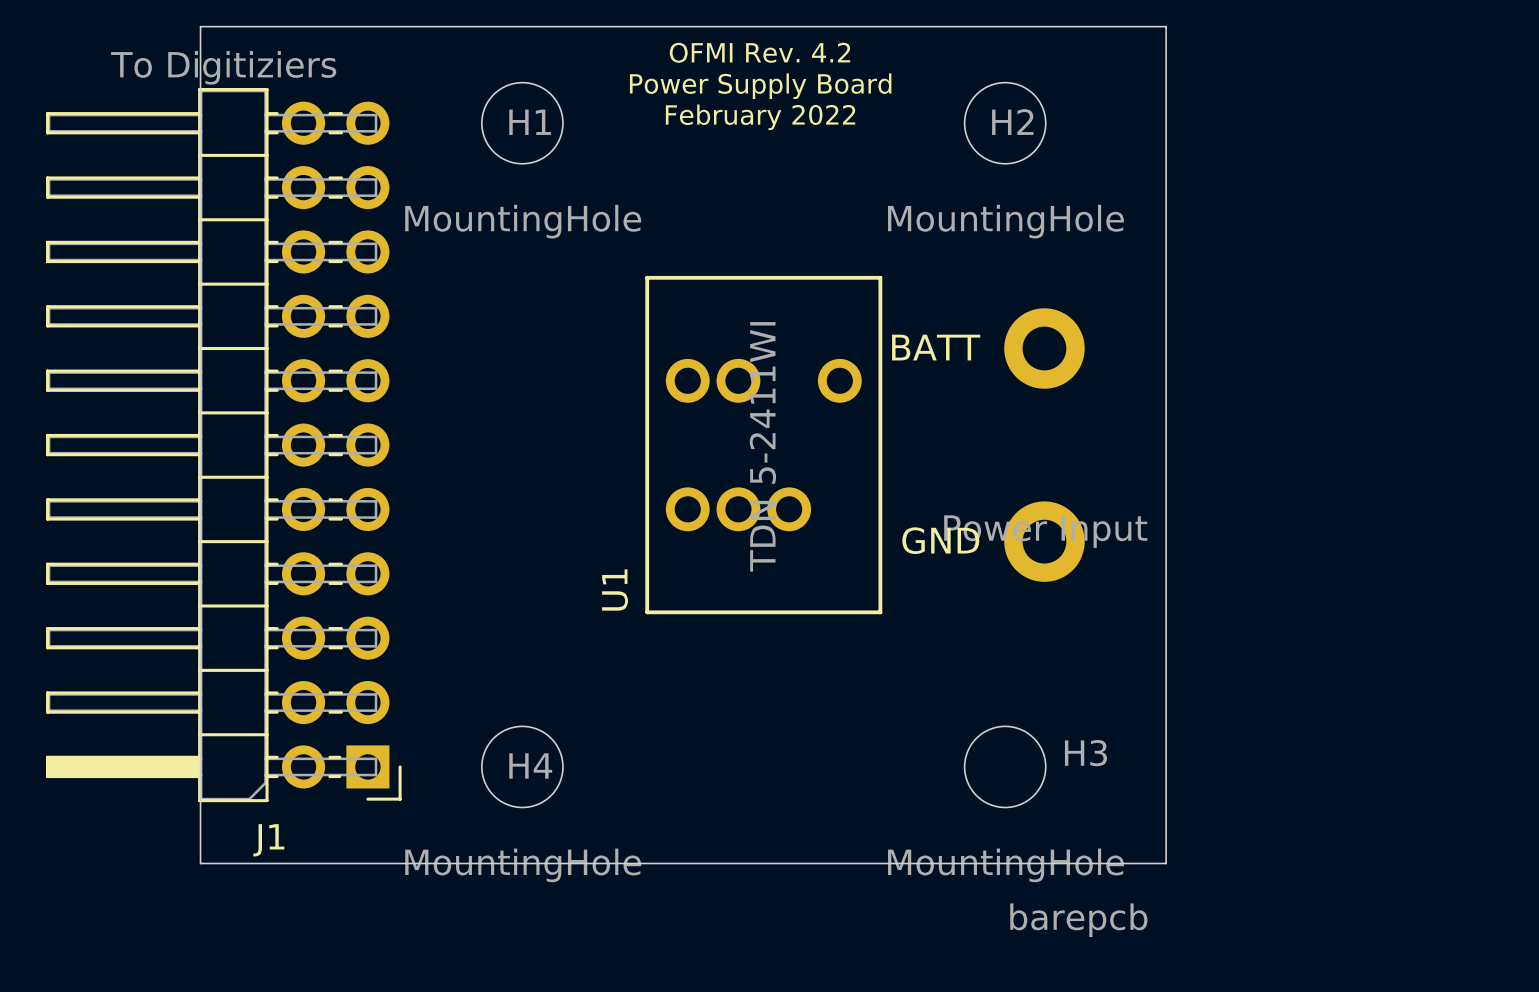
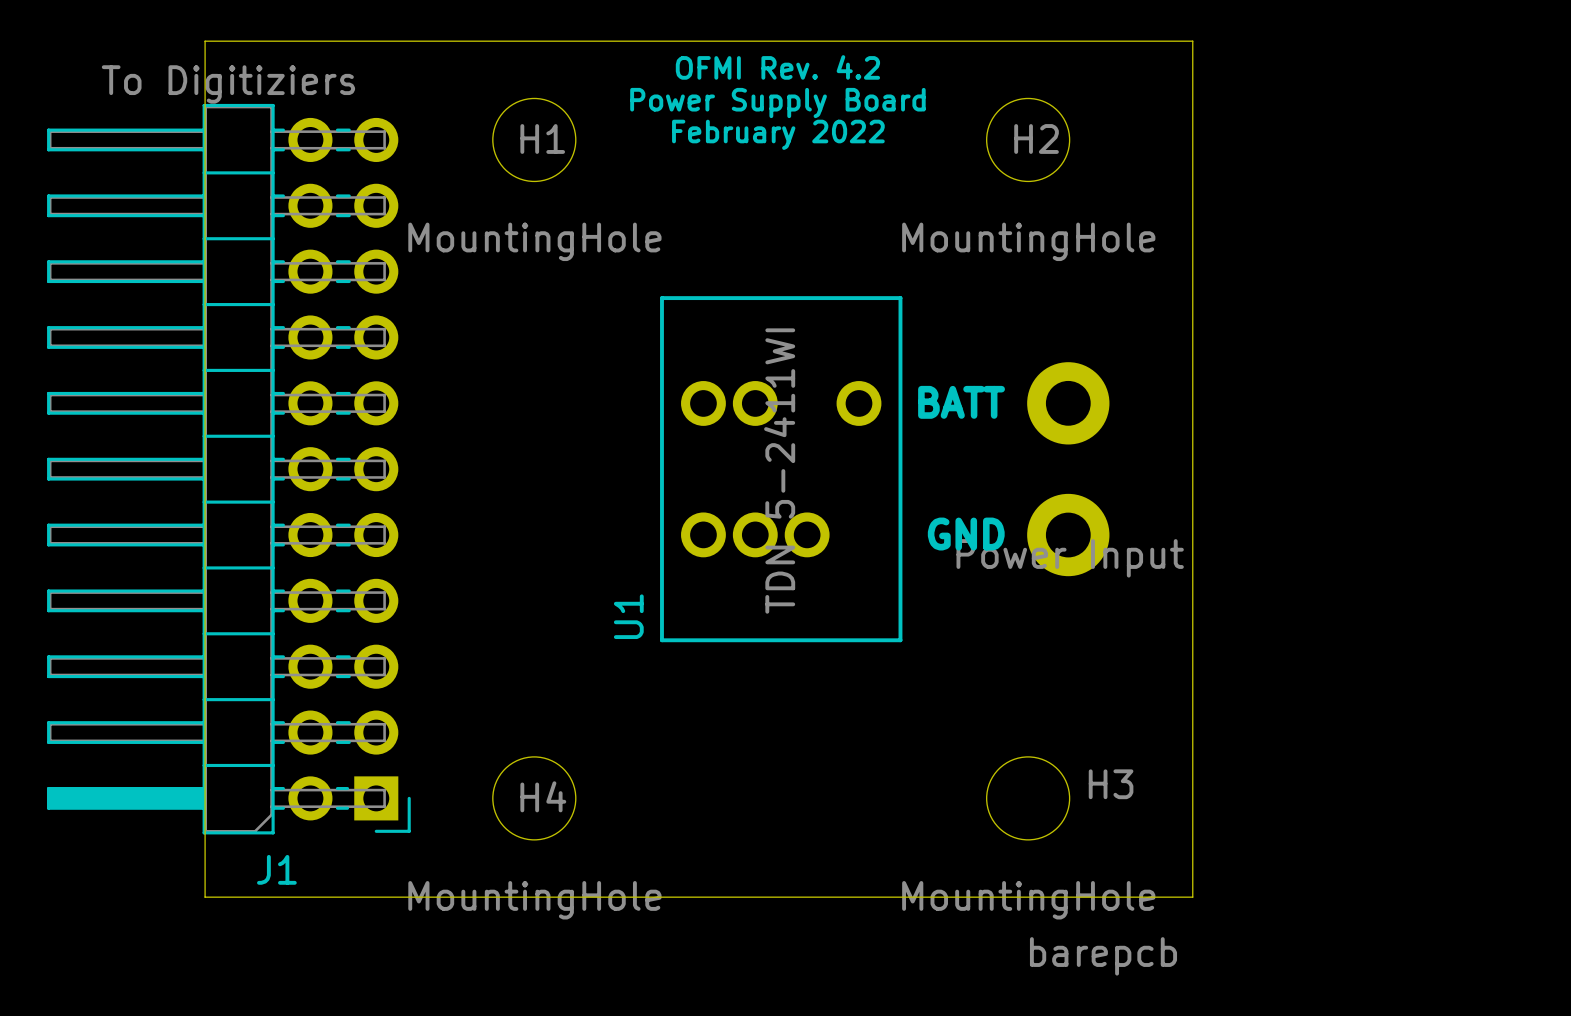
part footprint: [1004, 308, 1085, 582] -> [1027, 362, 1110, 577]
text position: BATT (936, 347) -> BATT (961, 402)
text position: GND (940, 540) -> GND (966, 534)

